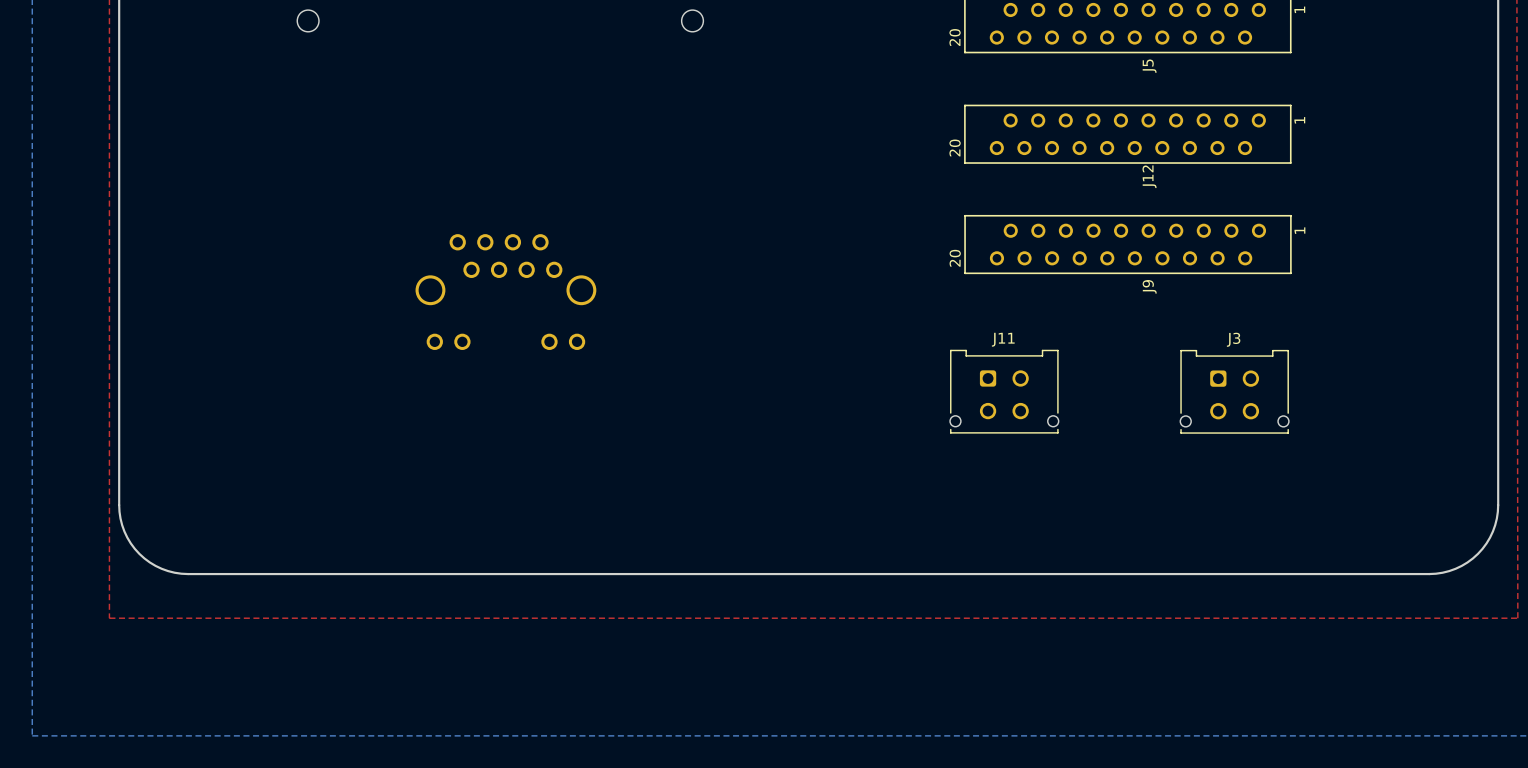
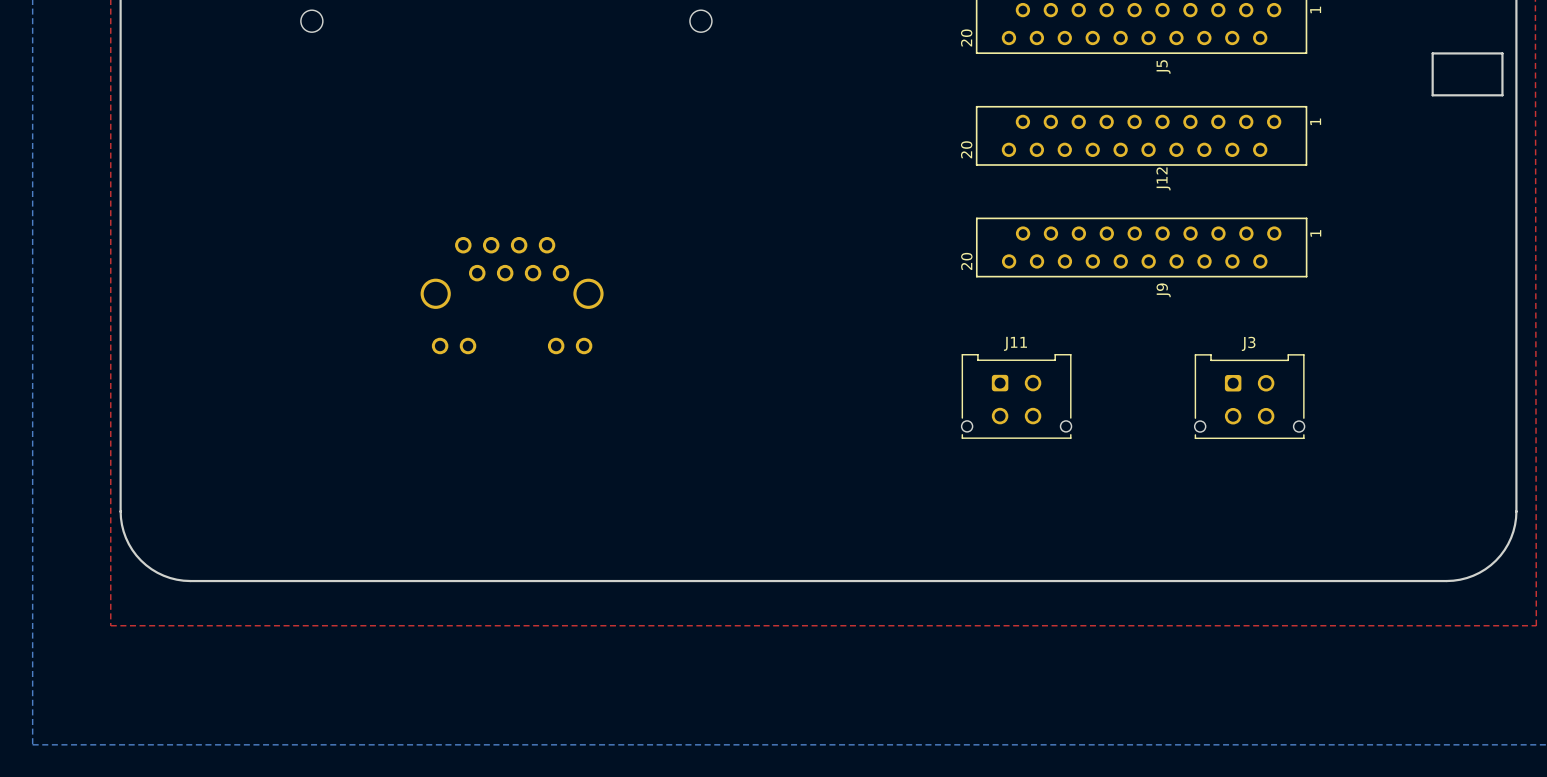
board edge: none -> (1432, 53) (1432, 95) (1502, 95) (1502, 53) (1432, 53)

